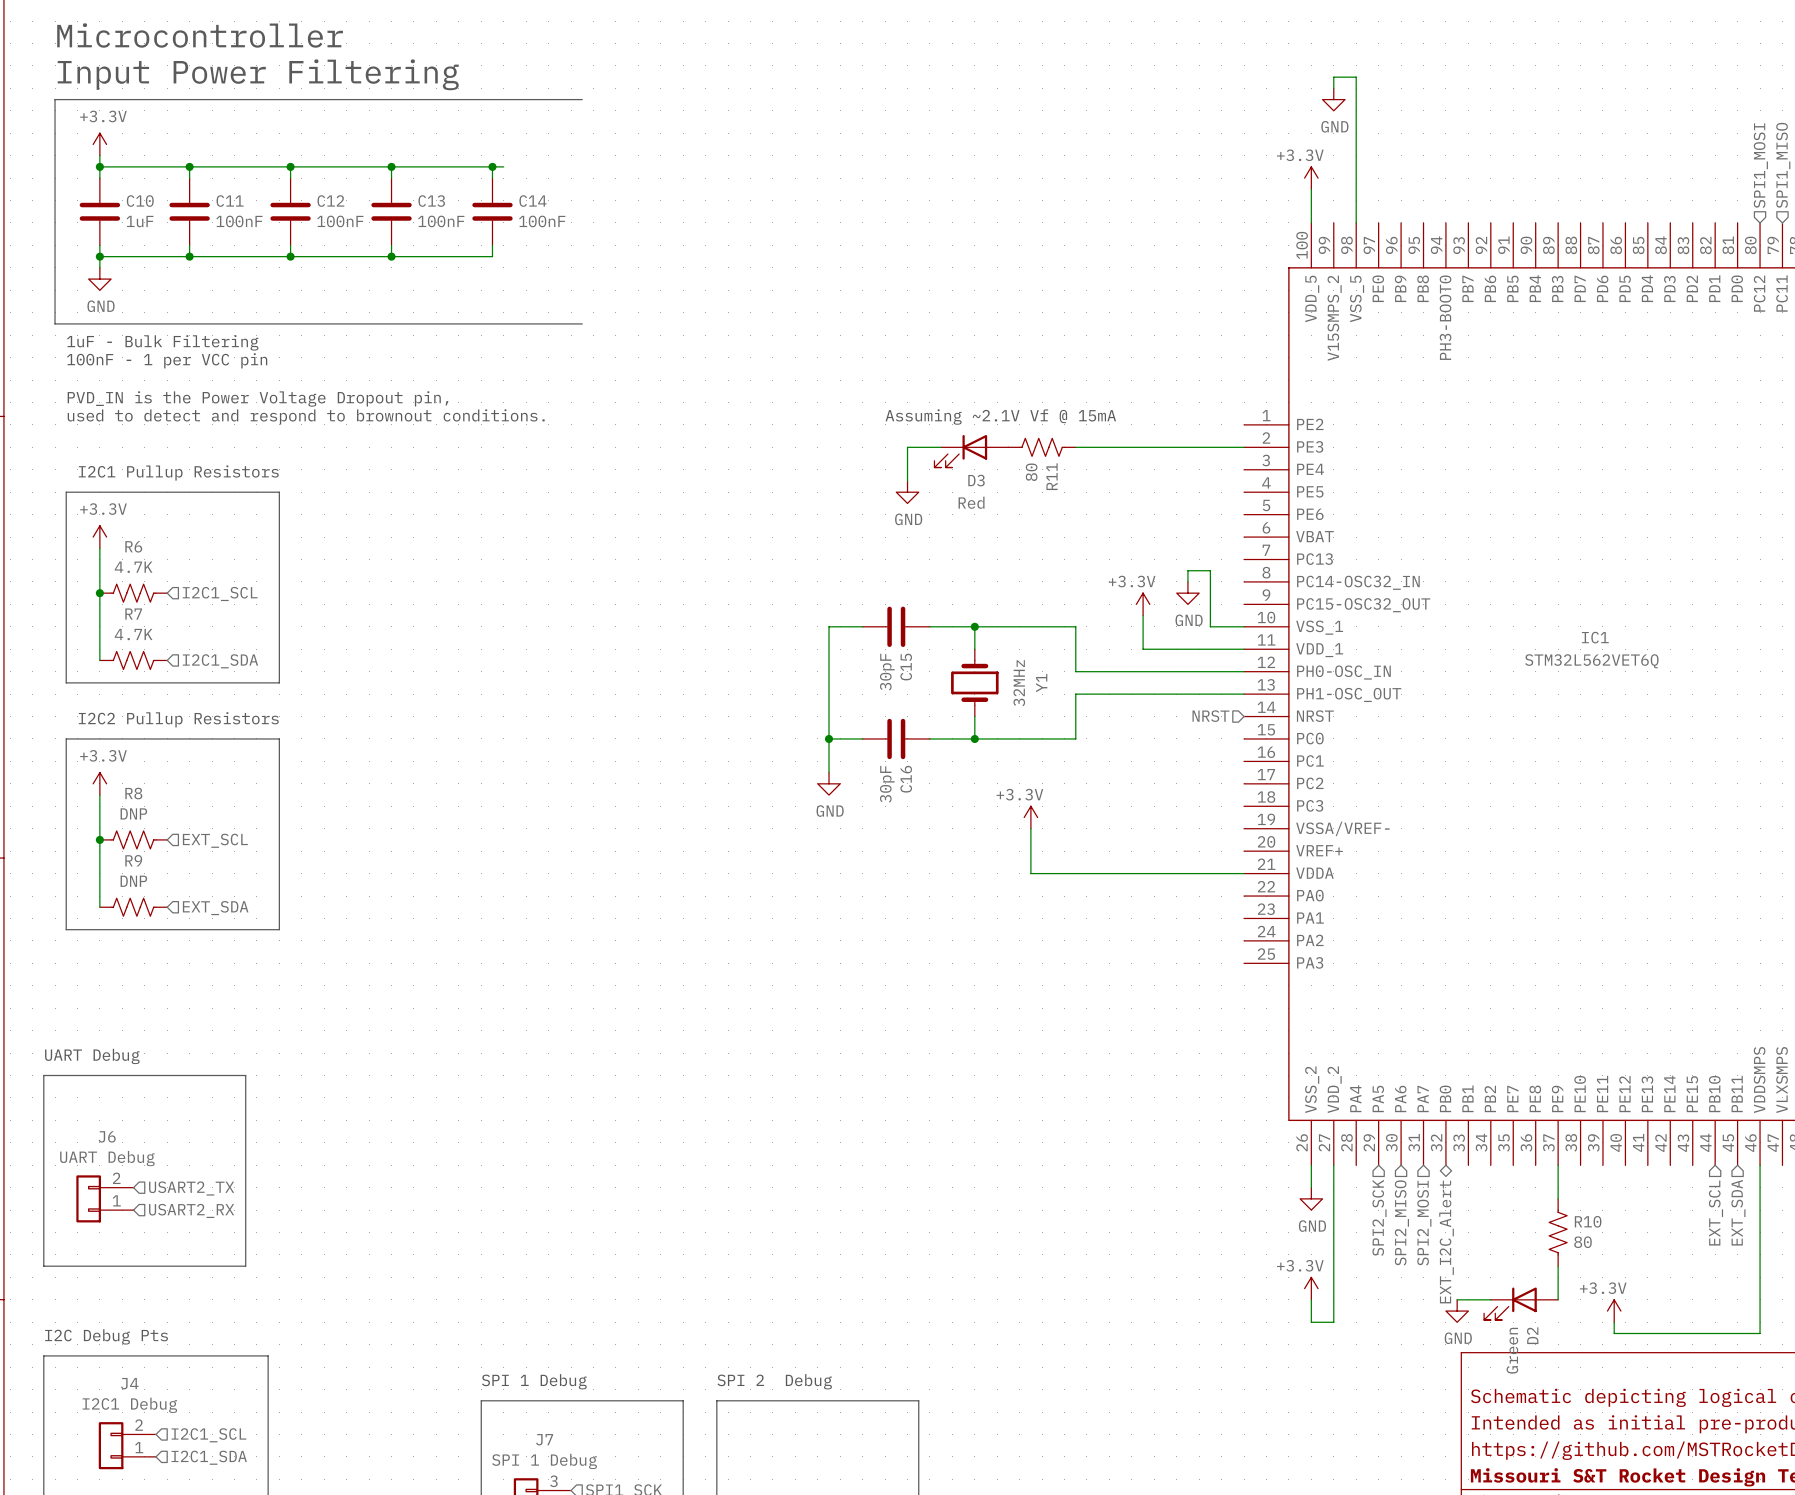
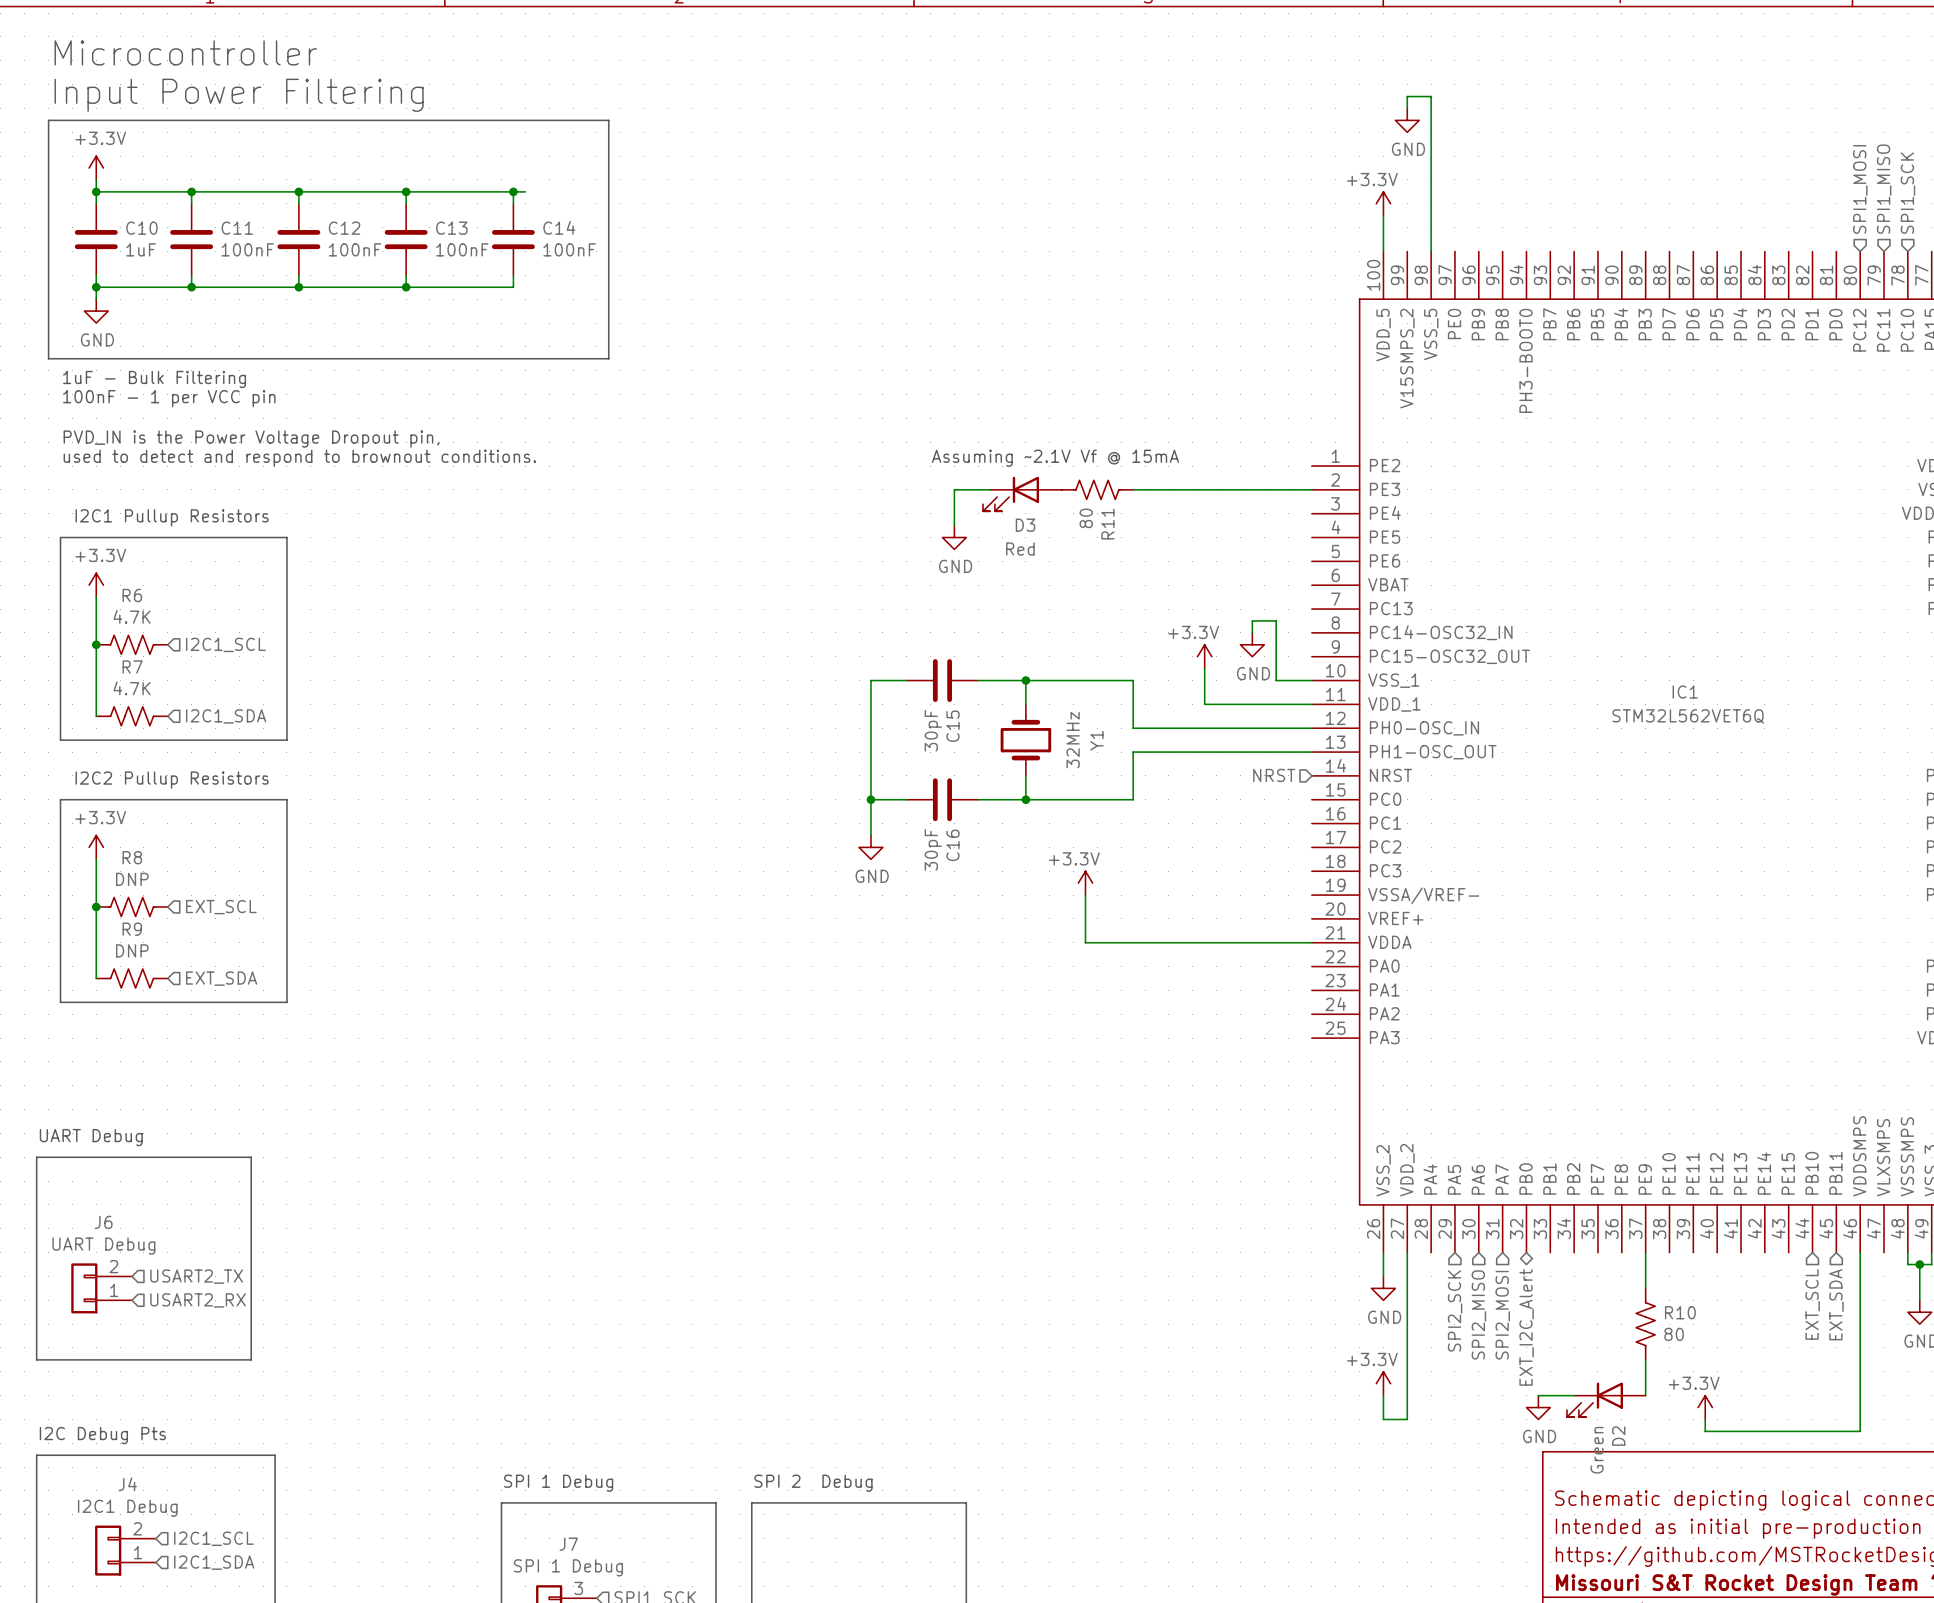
line: none -> (608, 120) (608, 358)

